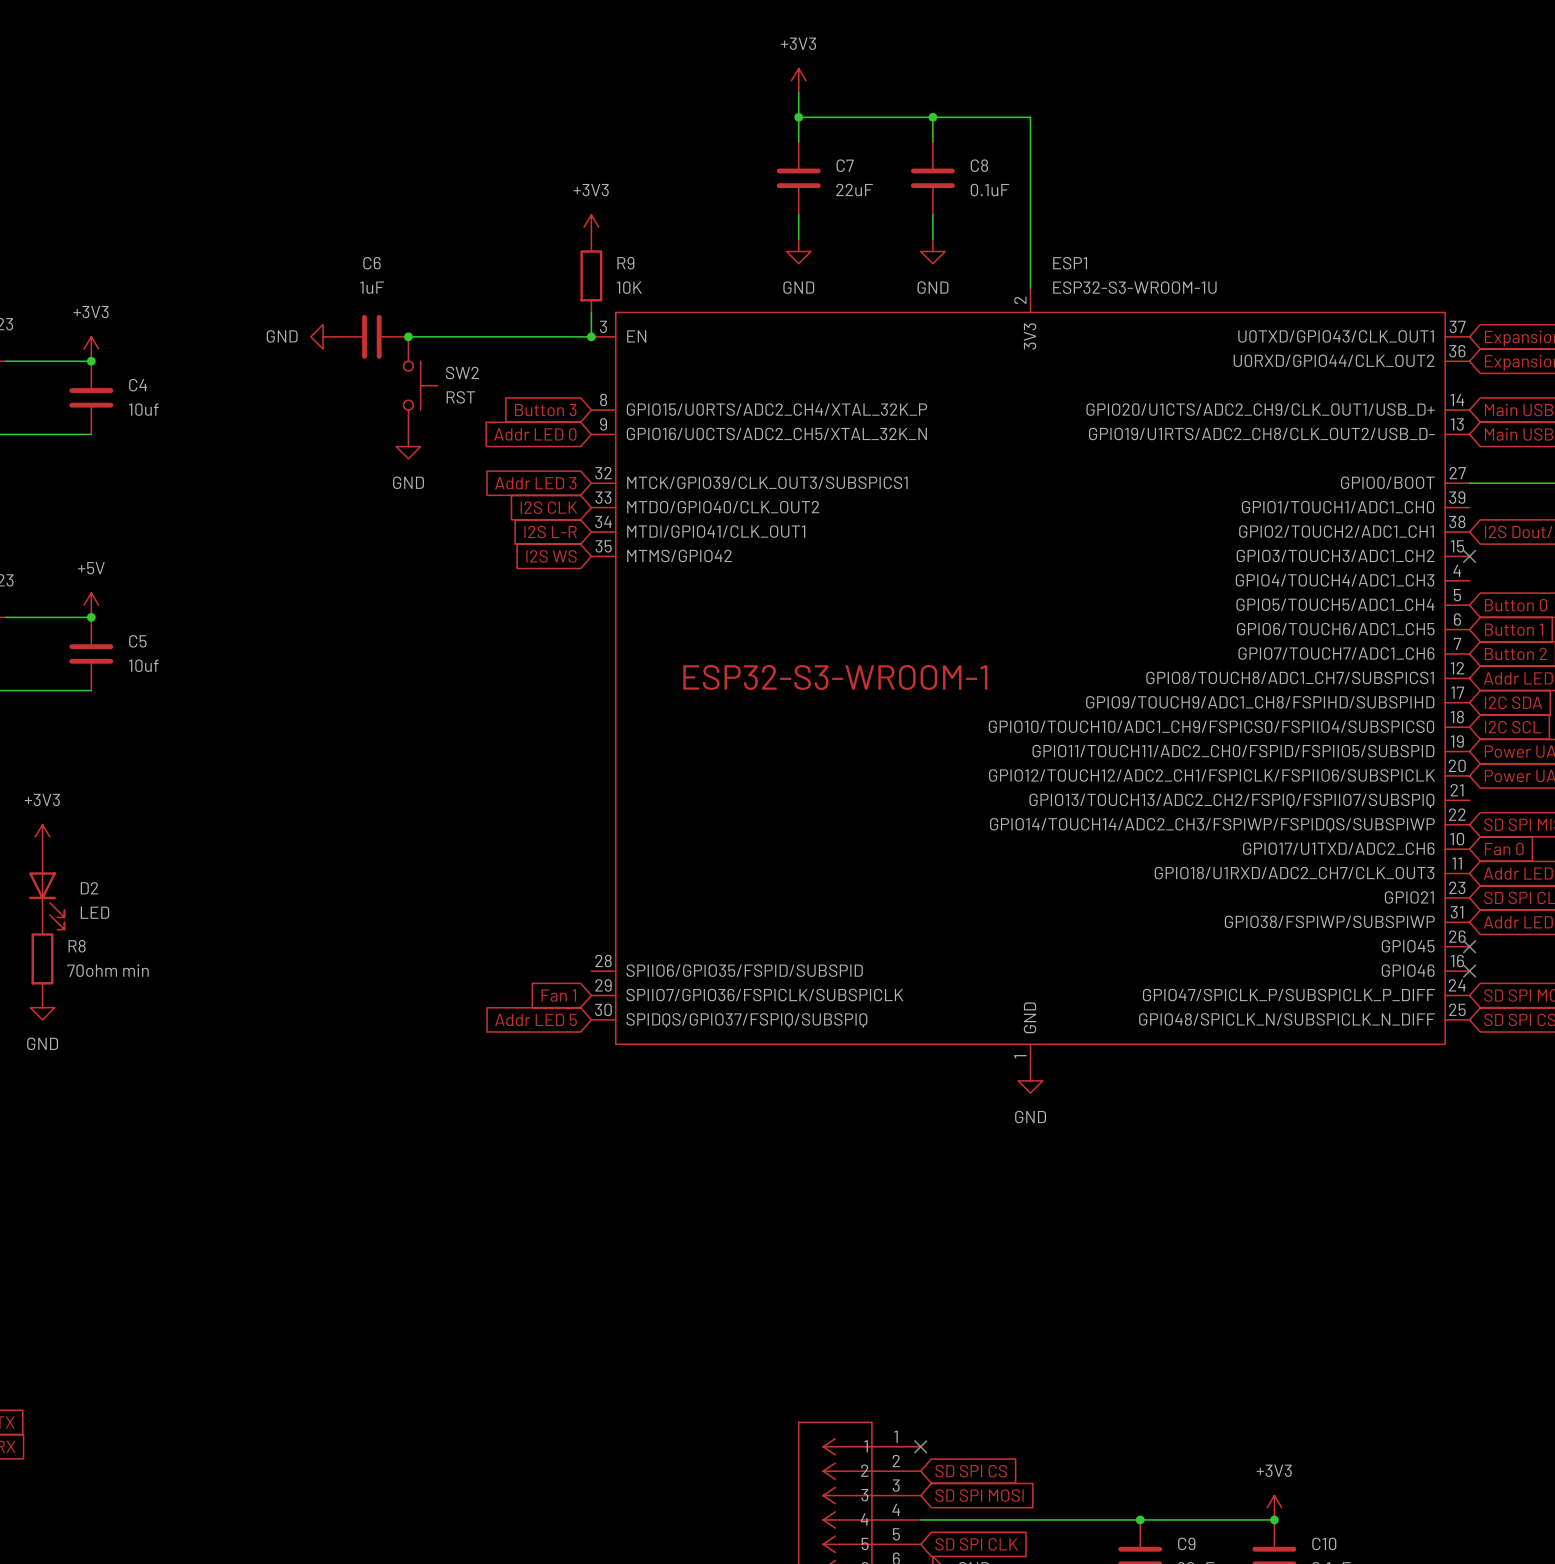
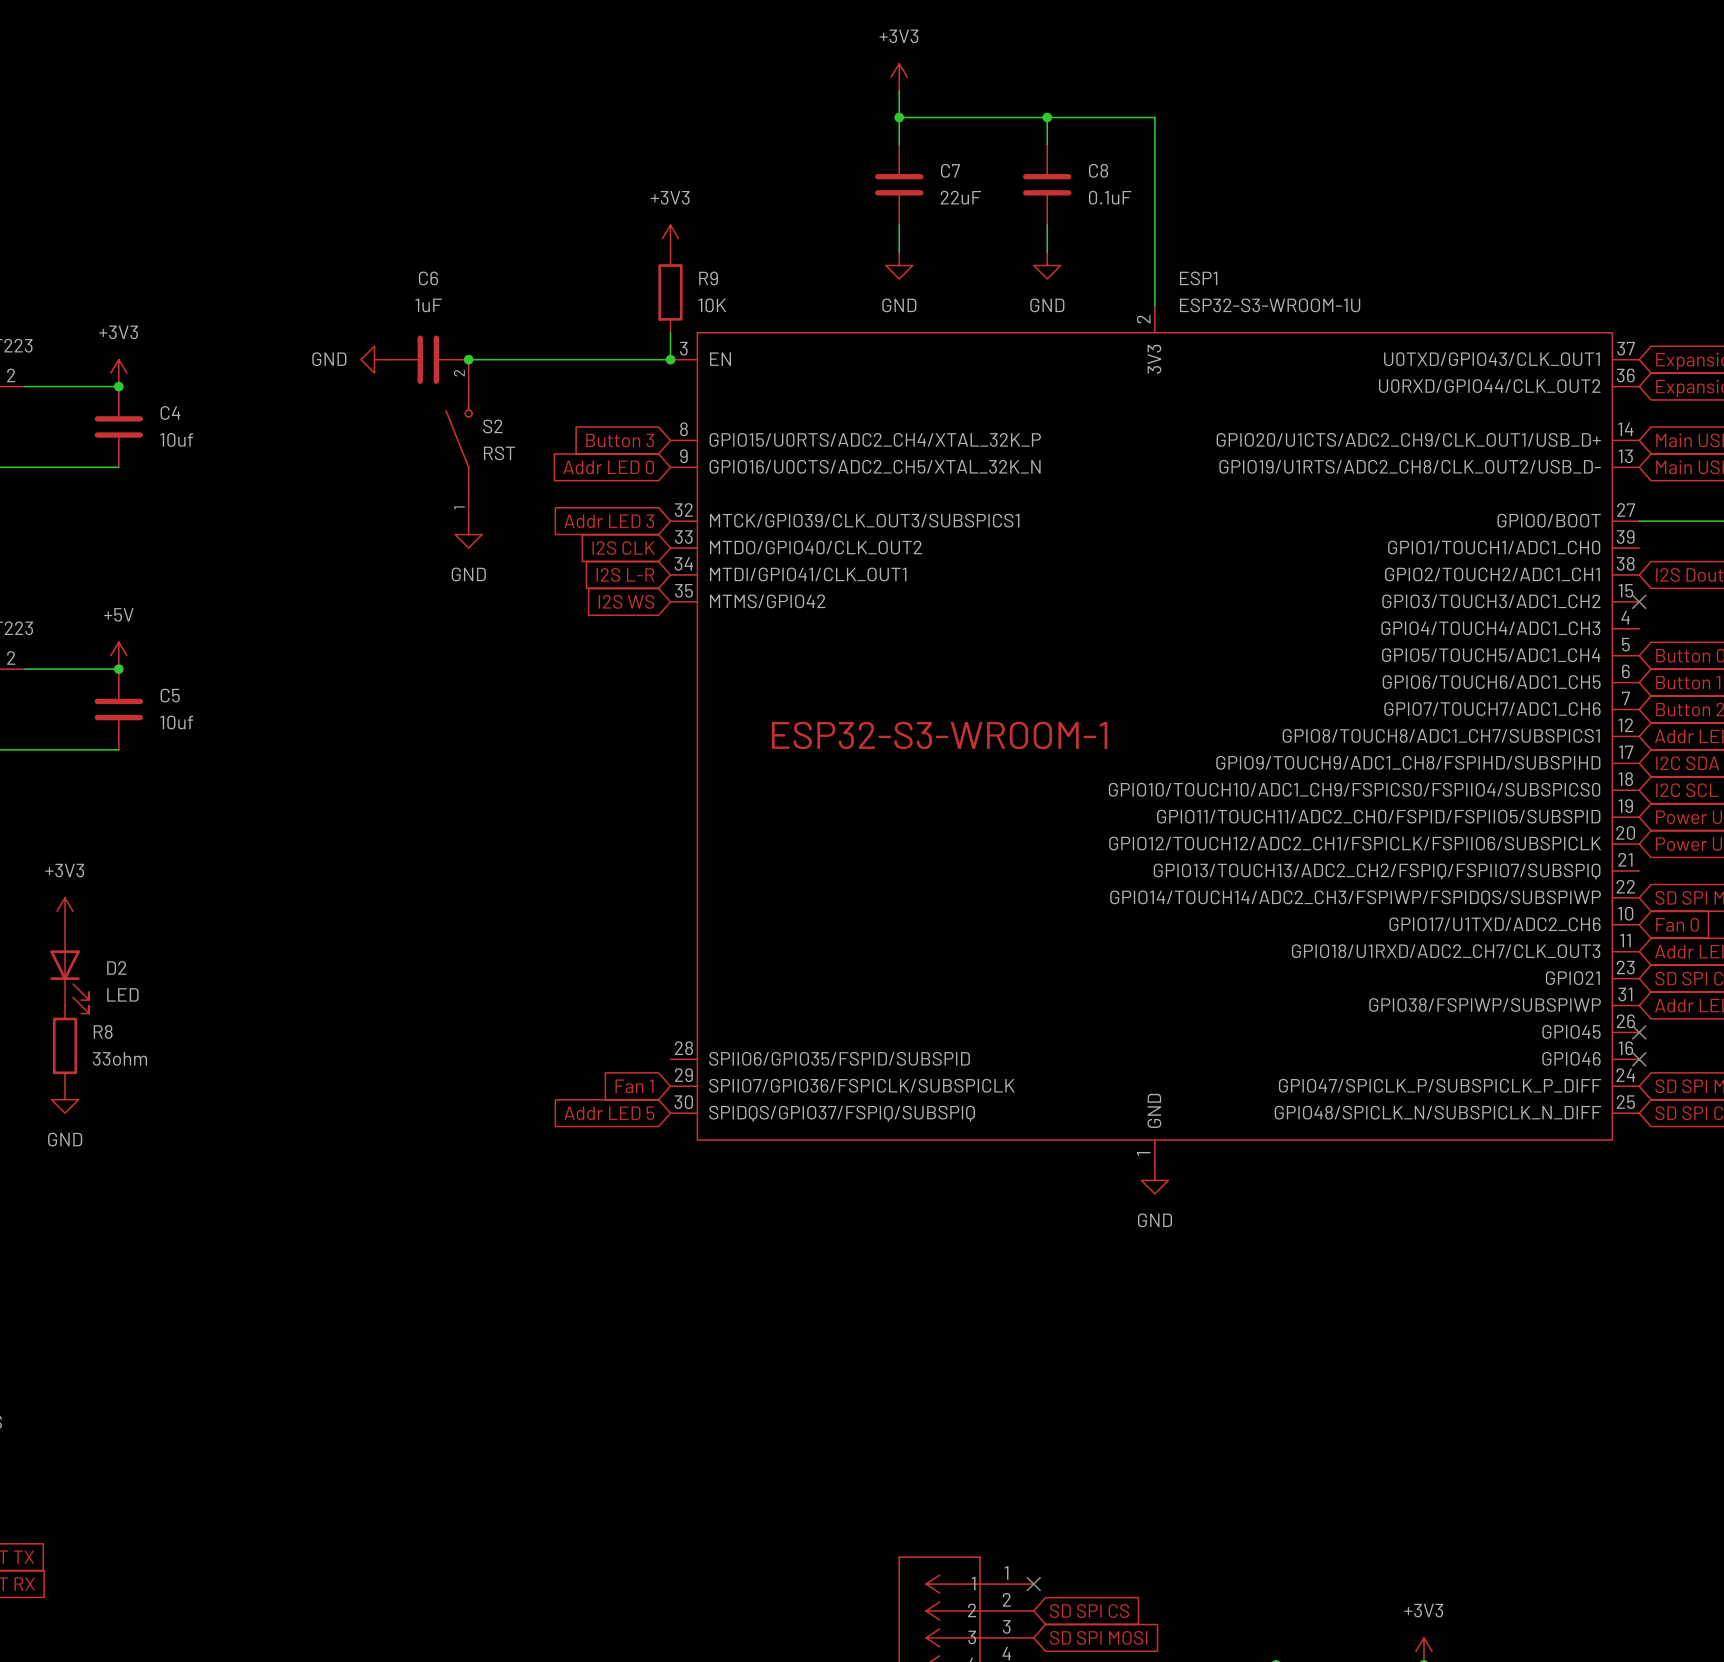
SW2: RST (420, 385) -> none
S2: none -> RST (459, 440)
power symbol position: GND (408, 446) -> GND (468, 534)
R8 value: 70ohm min (108, 970) -> 33ohm (119, 1058)

